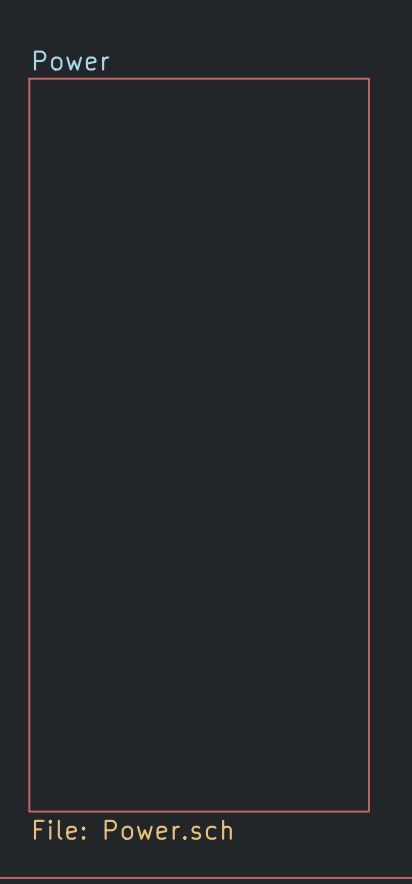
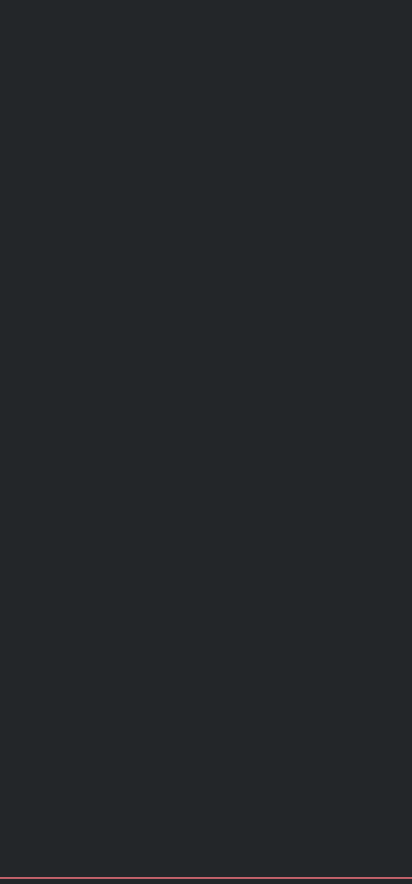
sheet Power: File: Power.sch (199, 445) -> none

